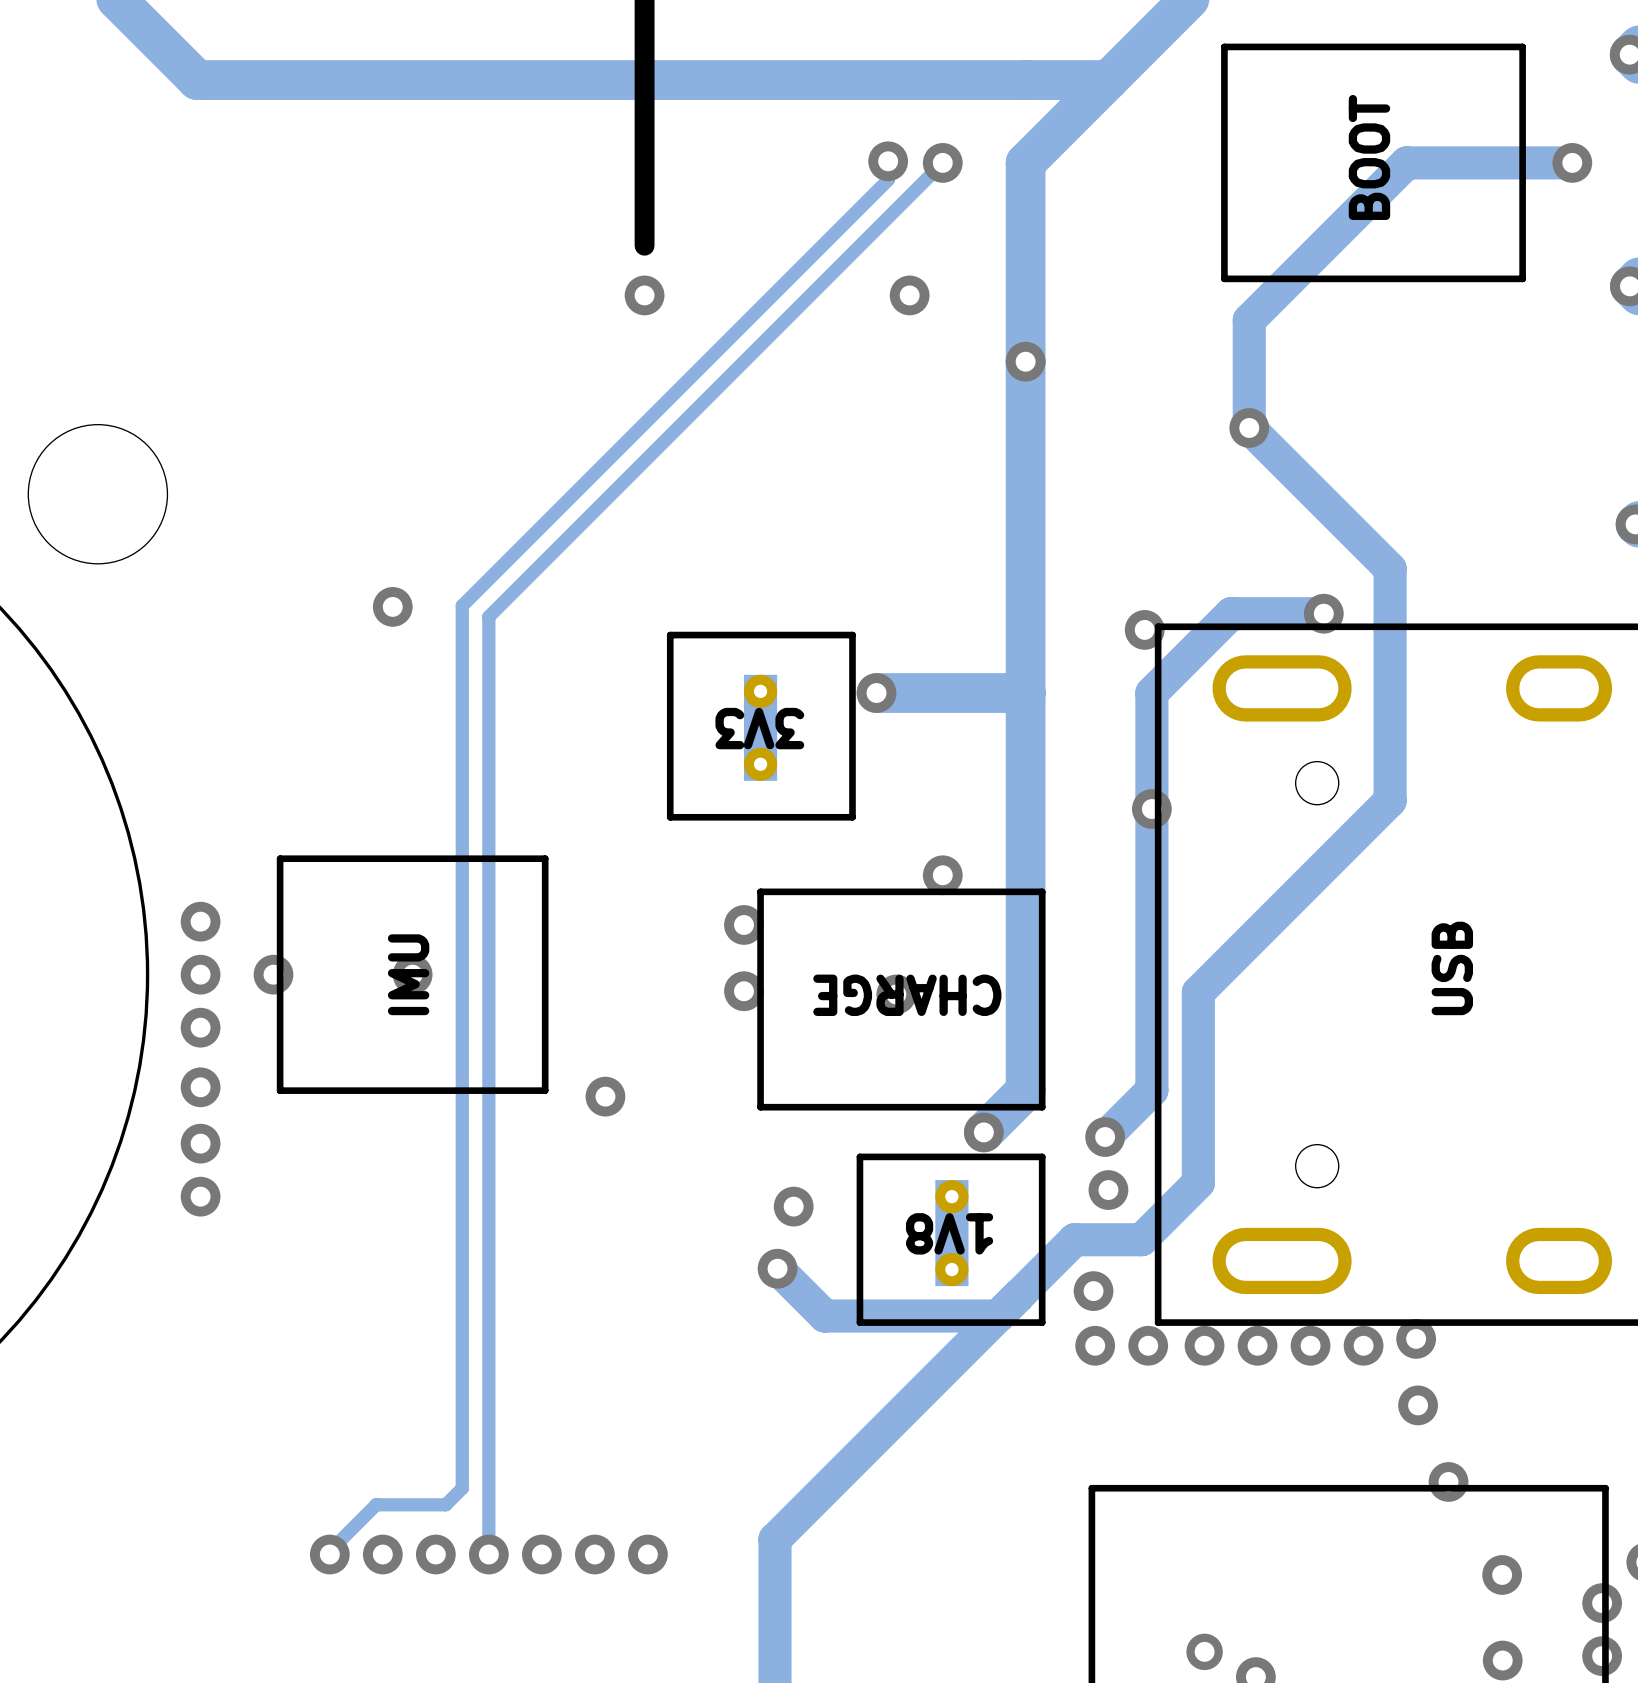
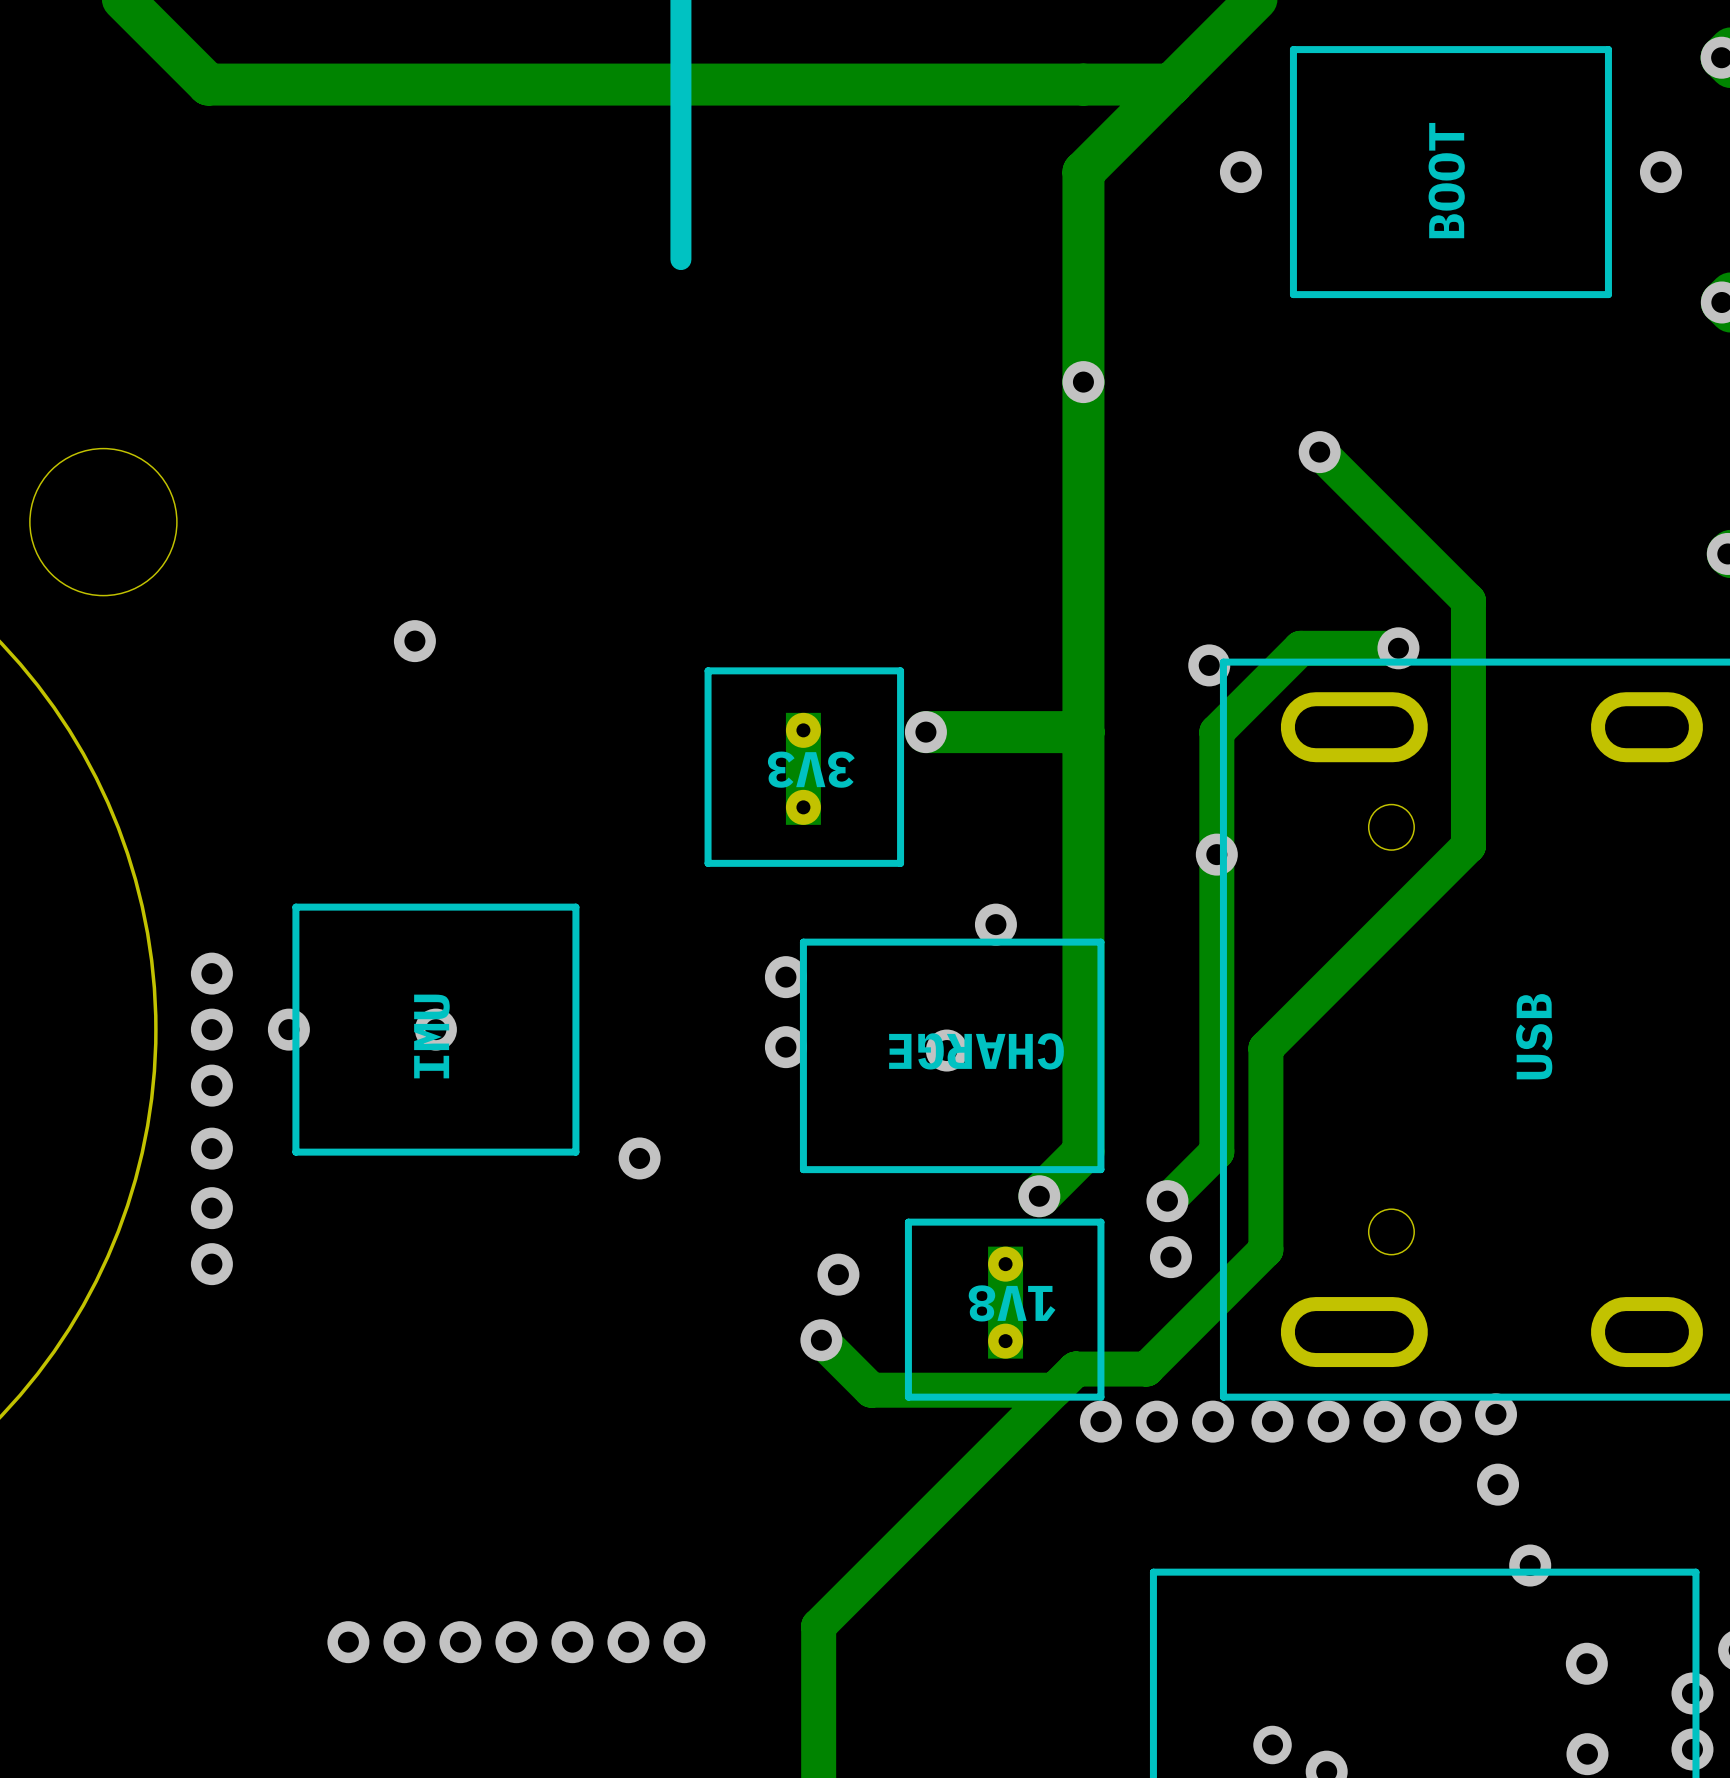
track: (888, 161) (888, 179) (462, 605) (462, 1488) (445, 1504) (376, 1504) (329, 1551) (329, 1554) -> none
via: (888, 161) -> none
track: (942, 162) (488, 616) (488, 1554) -> none
via: (942, 162) -> none
via: none -> (1240, 172)
track: (1572, 162) (1406, 162) (1249, 320) (1249, 427) -> none
via: (644, 295) -> none
via: (909, 295) -> none
track: (1141, 1239) (1074, 1239) (1018, 1296) -> (1205, 1309) (1146, 1369) (1075, 1369)
via position: (1093, 1291) -> (1100, 1421)

